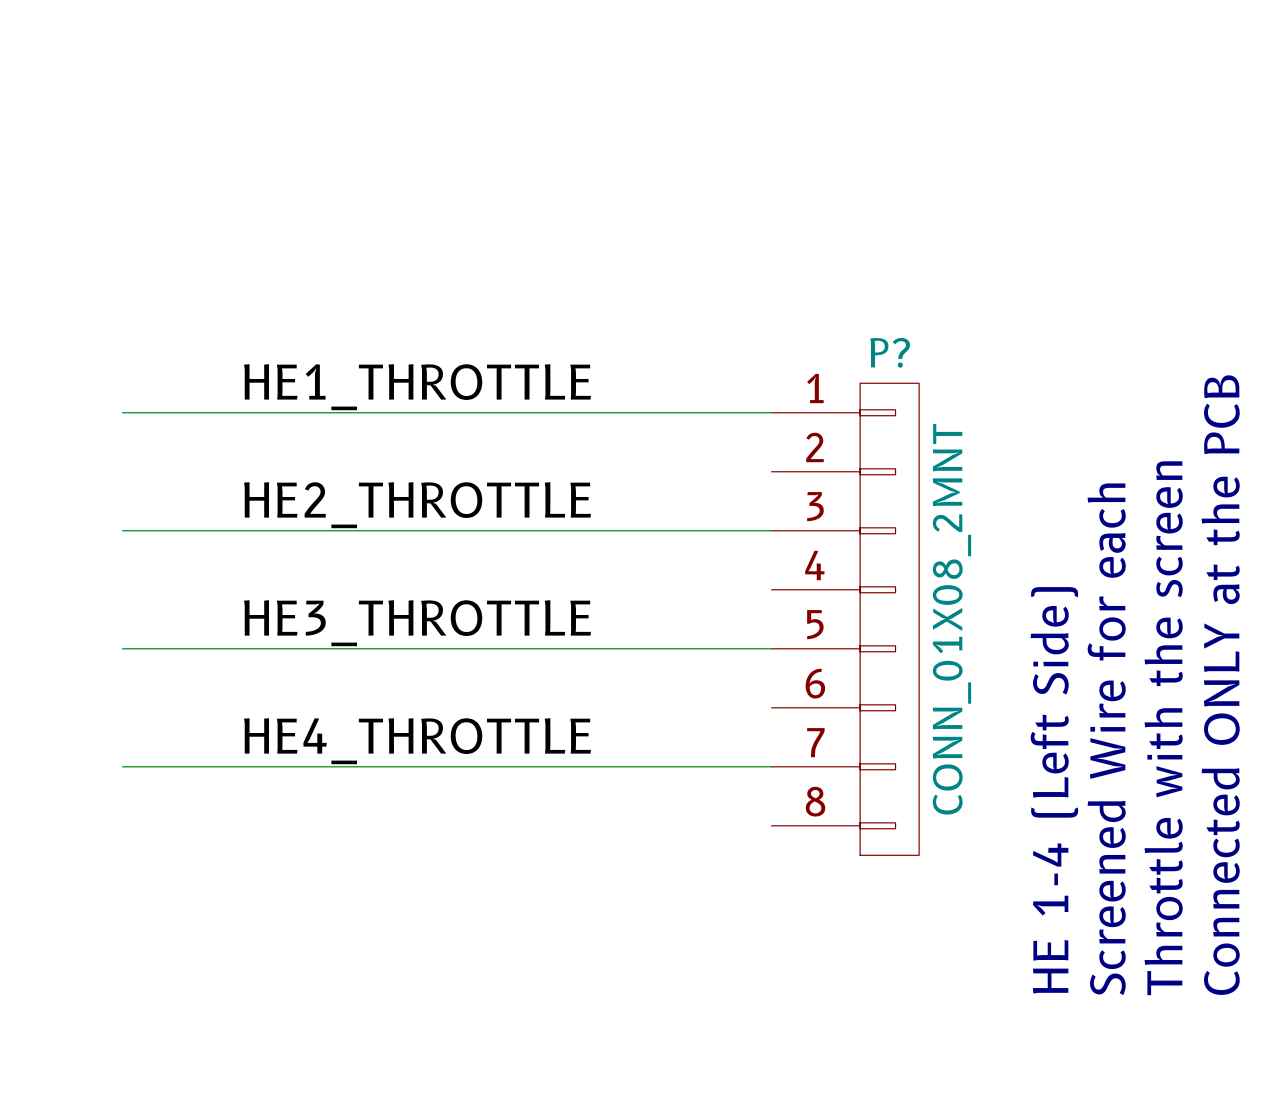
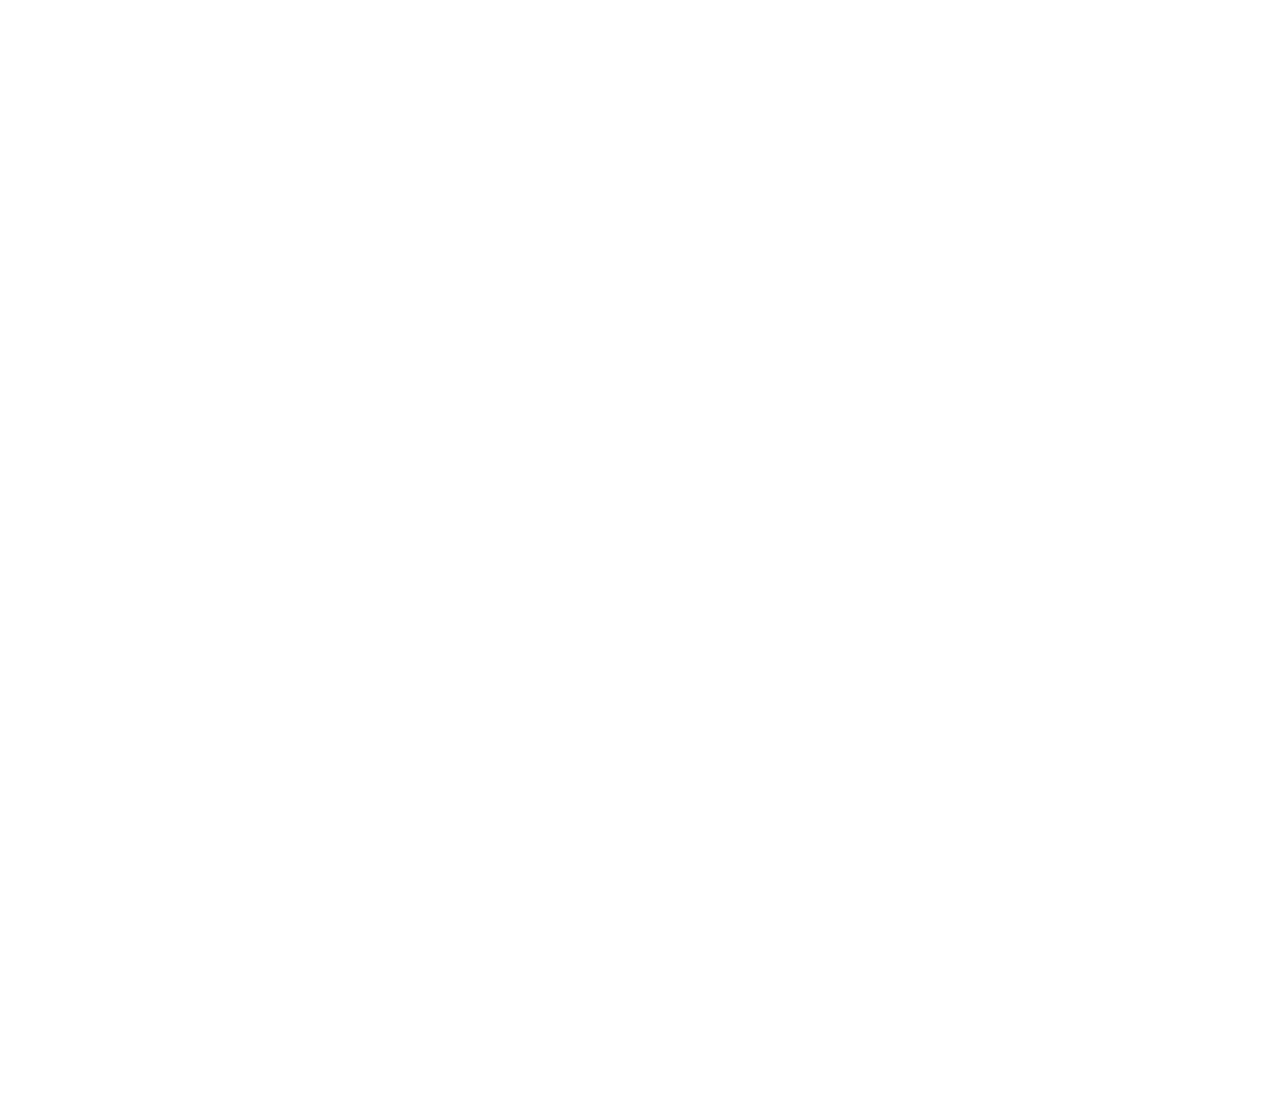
label: HE1_THROTTLE (417, 387) -> none
wire: (122, 412) (771, 412) -> none
label: HE2_THROTTLE (417, 505) -> none
wire: (122, 530) (771, 530) -> none
P?: CONN_01X08_2MNT (845, 619) -> none
label: HE3_THROTTLE (417, 623) -> none
wire: (122, 648) (771, 648) -> none
text: Connected ONLY at the PCB (1220, 685) -> none
text: Throttle with the screen (1163, 728) -> none
text: Screened Wire for each (1106, 739) -> none
label: HE4_THROTTLE (417, 741) -> none
wire: (122, 766) (771, 766) -> none
text: HE 1-4 (Left Side) (1054, 790) -> none

